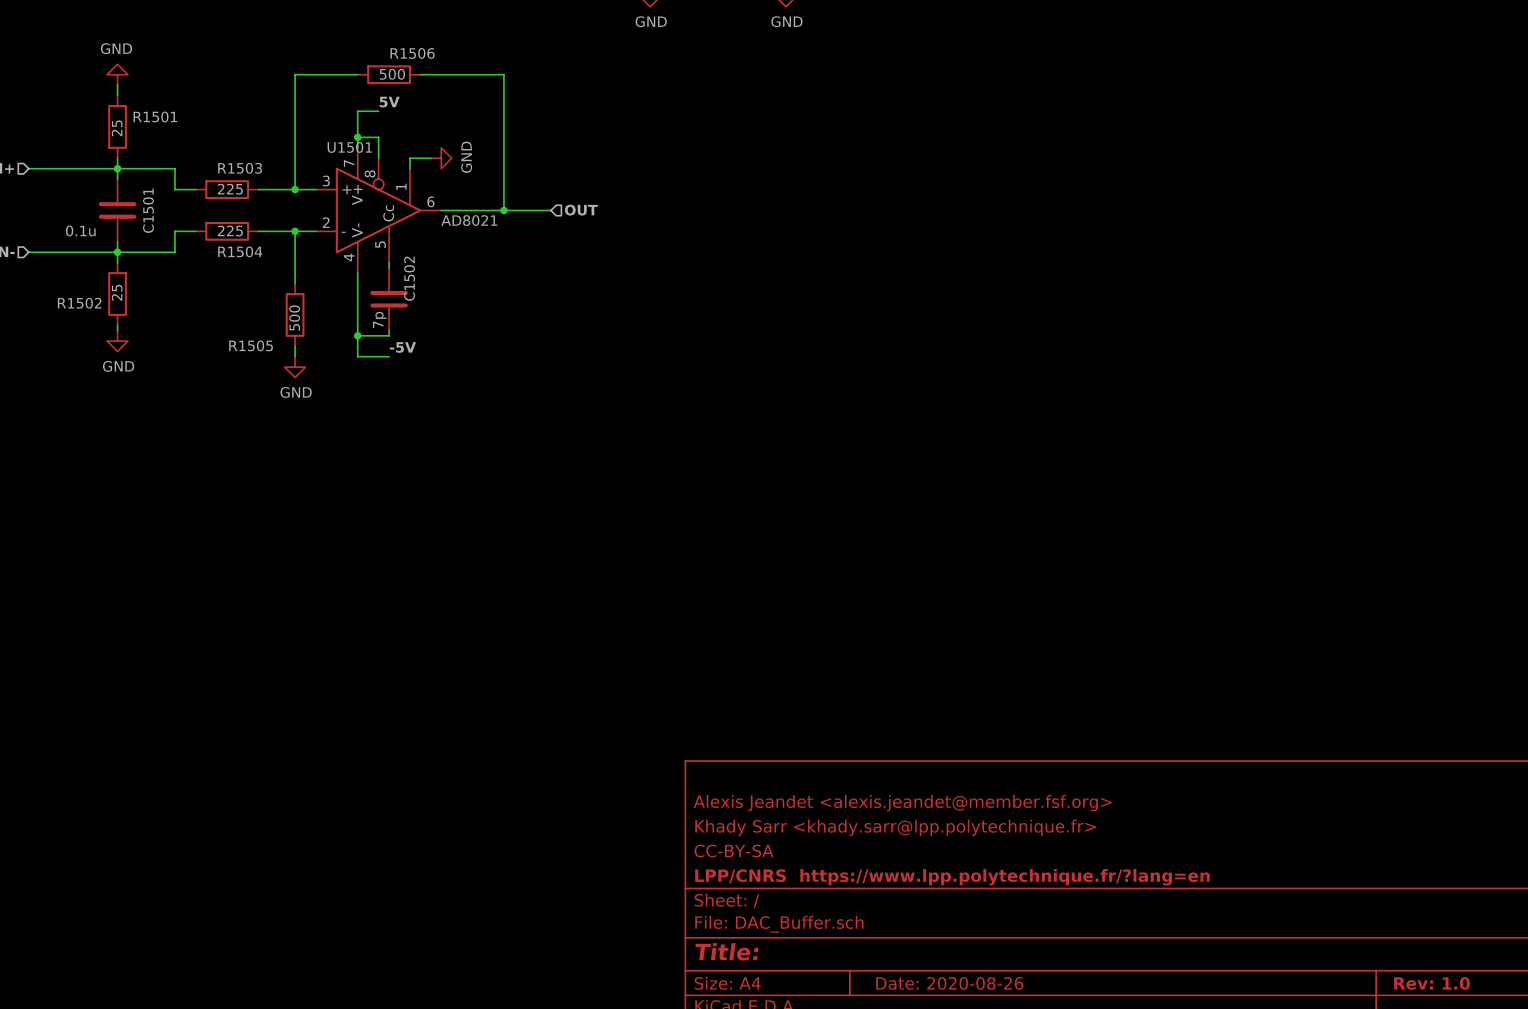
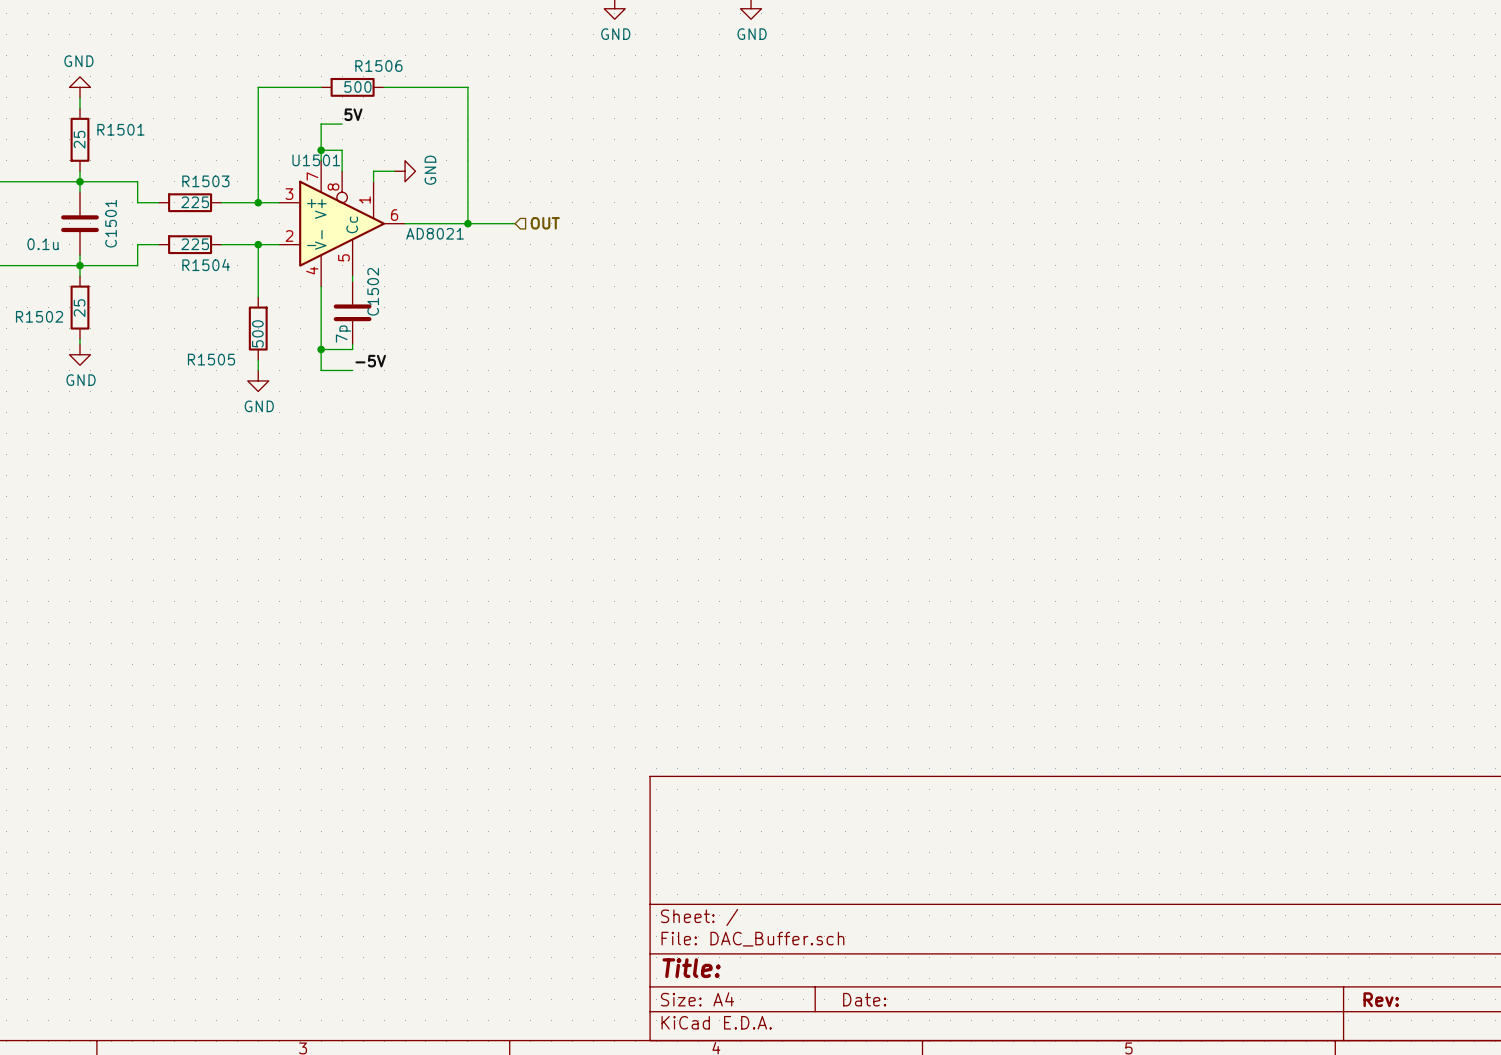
title block: Alexis Jeandet <alexis.jeandet@member.fsf.org> (902, 803) -> none
title block: Khady Sarr <khady.sarr@lpp.polytechnique.fr> (895, 827) -> none
title block: CC-BY-SA (734, 851) -> none
title block: LPP/CNRS https://www.lpp.polytechnique.fr/?lang=en (952, 877) -> none
title block: Date: 2020-08-26 (949, 983) -> Date: (864, 999)
title block: Rev: 1.0 (1432, 983) -> Rev: (1381, 999)

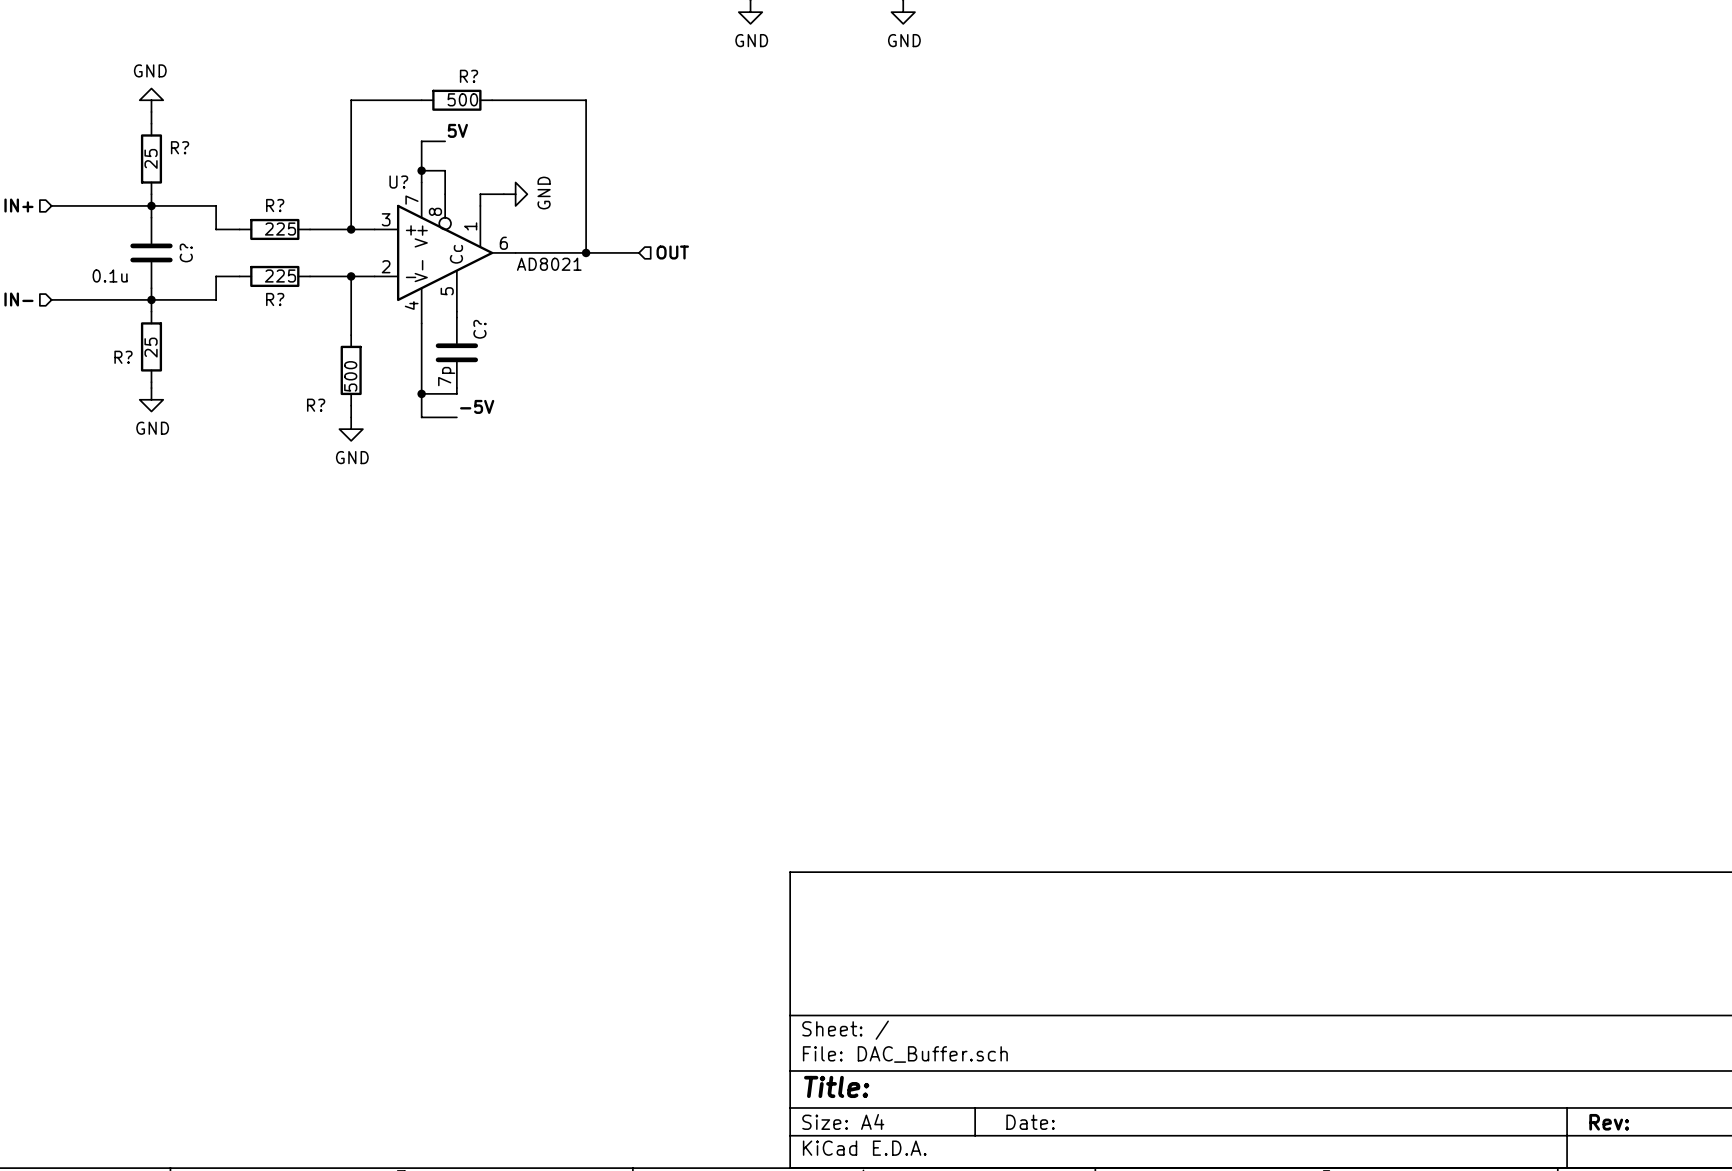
R1506 name: R1506 (378, 66) -> R? (469, 76)
R1501 name: R1501 (120, 129) -> R? (180, 147)
U1501 name: U1501 (316, 160) -> U? (398, 182)
R1503 name: R1503 (205, 181) -> R? (275, 205)
C1501 name: C1501 (111, 223) -> C? (186, 252)
R1504 name: R1504 (206, 264) -> R? (275, 299)
C1502 name: C1502 (373, 291) -> C? (479, 329)
R1502 name: R1502 (39, 316) -> R? (123, 357)
R1505 name: R1505 (211, 359) -> R? (316, 405)

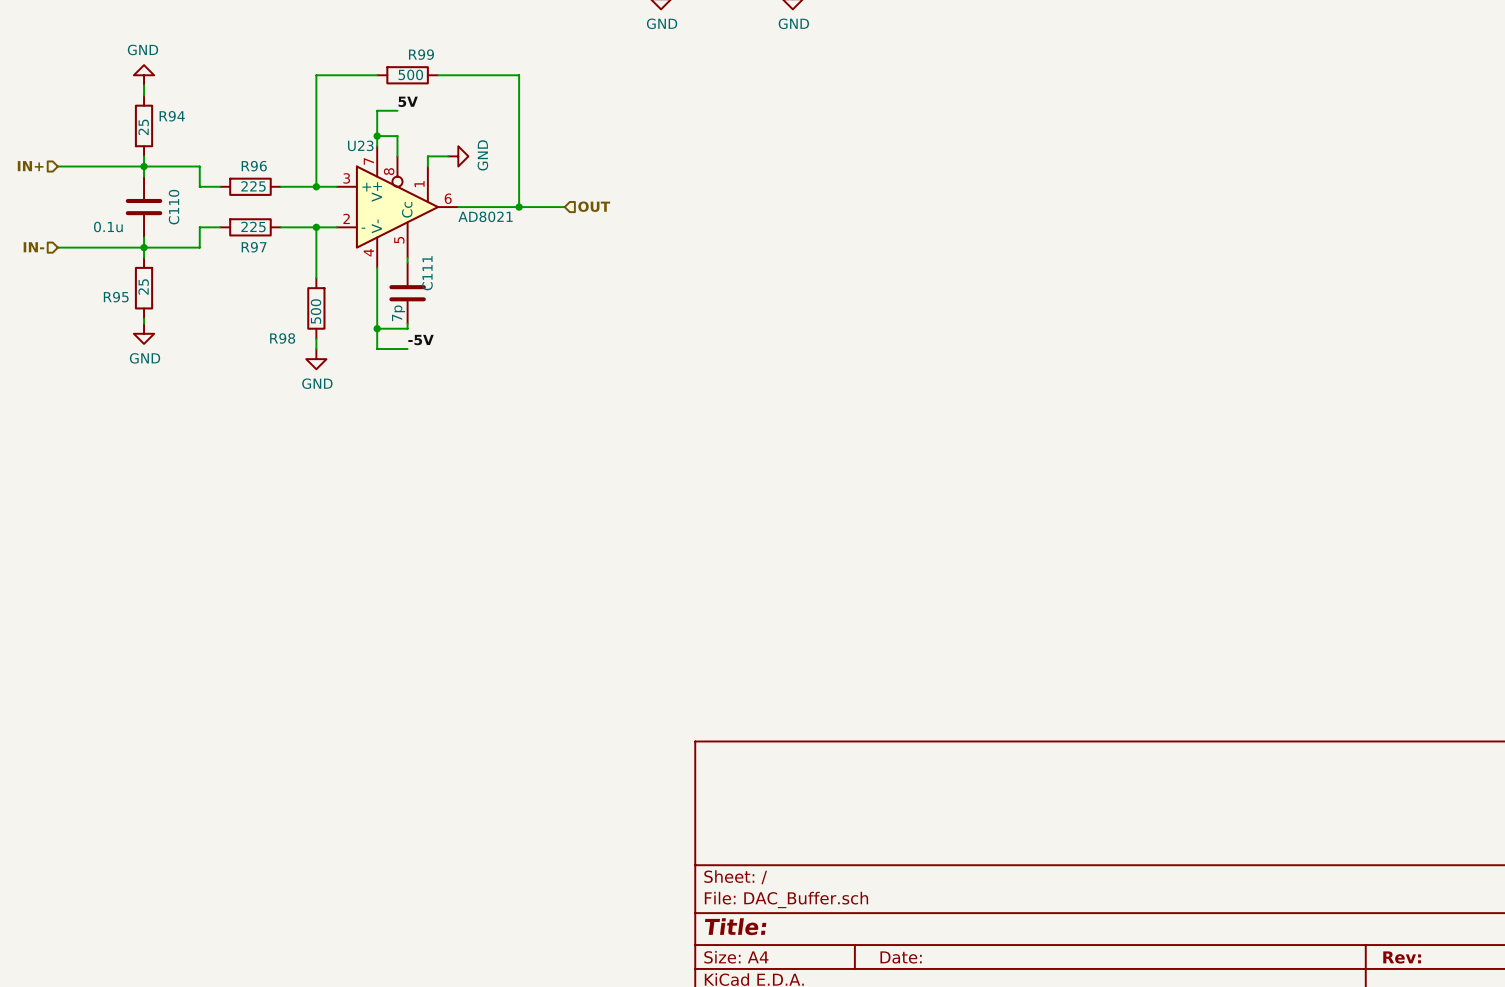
R? name: R? (469, 76) -> R99 (421, 54)
R? name: R? (180, 147) -> R94 (172, 116)
U? name: U? (398, 182) -> U23 (360, 145)
R? name: R? (275, 205) -> R96 (254, 166)
C? name: C? (186, 252) -> C110 (174, 207)
R? name: R? (275, 299) -> R97 (254, 247)
C? name: C? (479, 329) -> C111 (427, 273)
R? name: R? (123, 357) -> R95 (116, 297)
R? name: R? (316, 405) -> R98 (282, 338)

